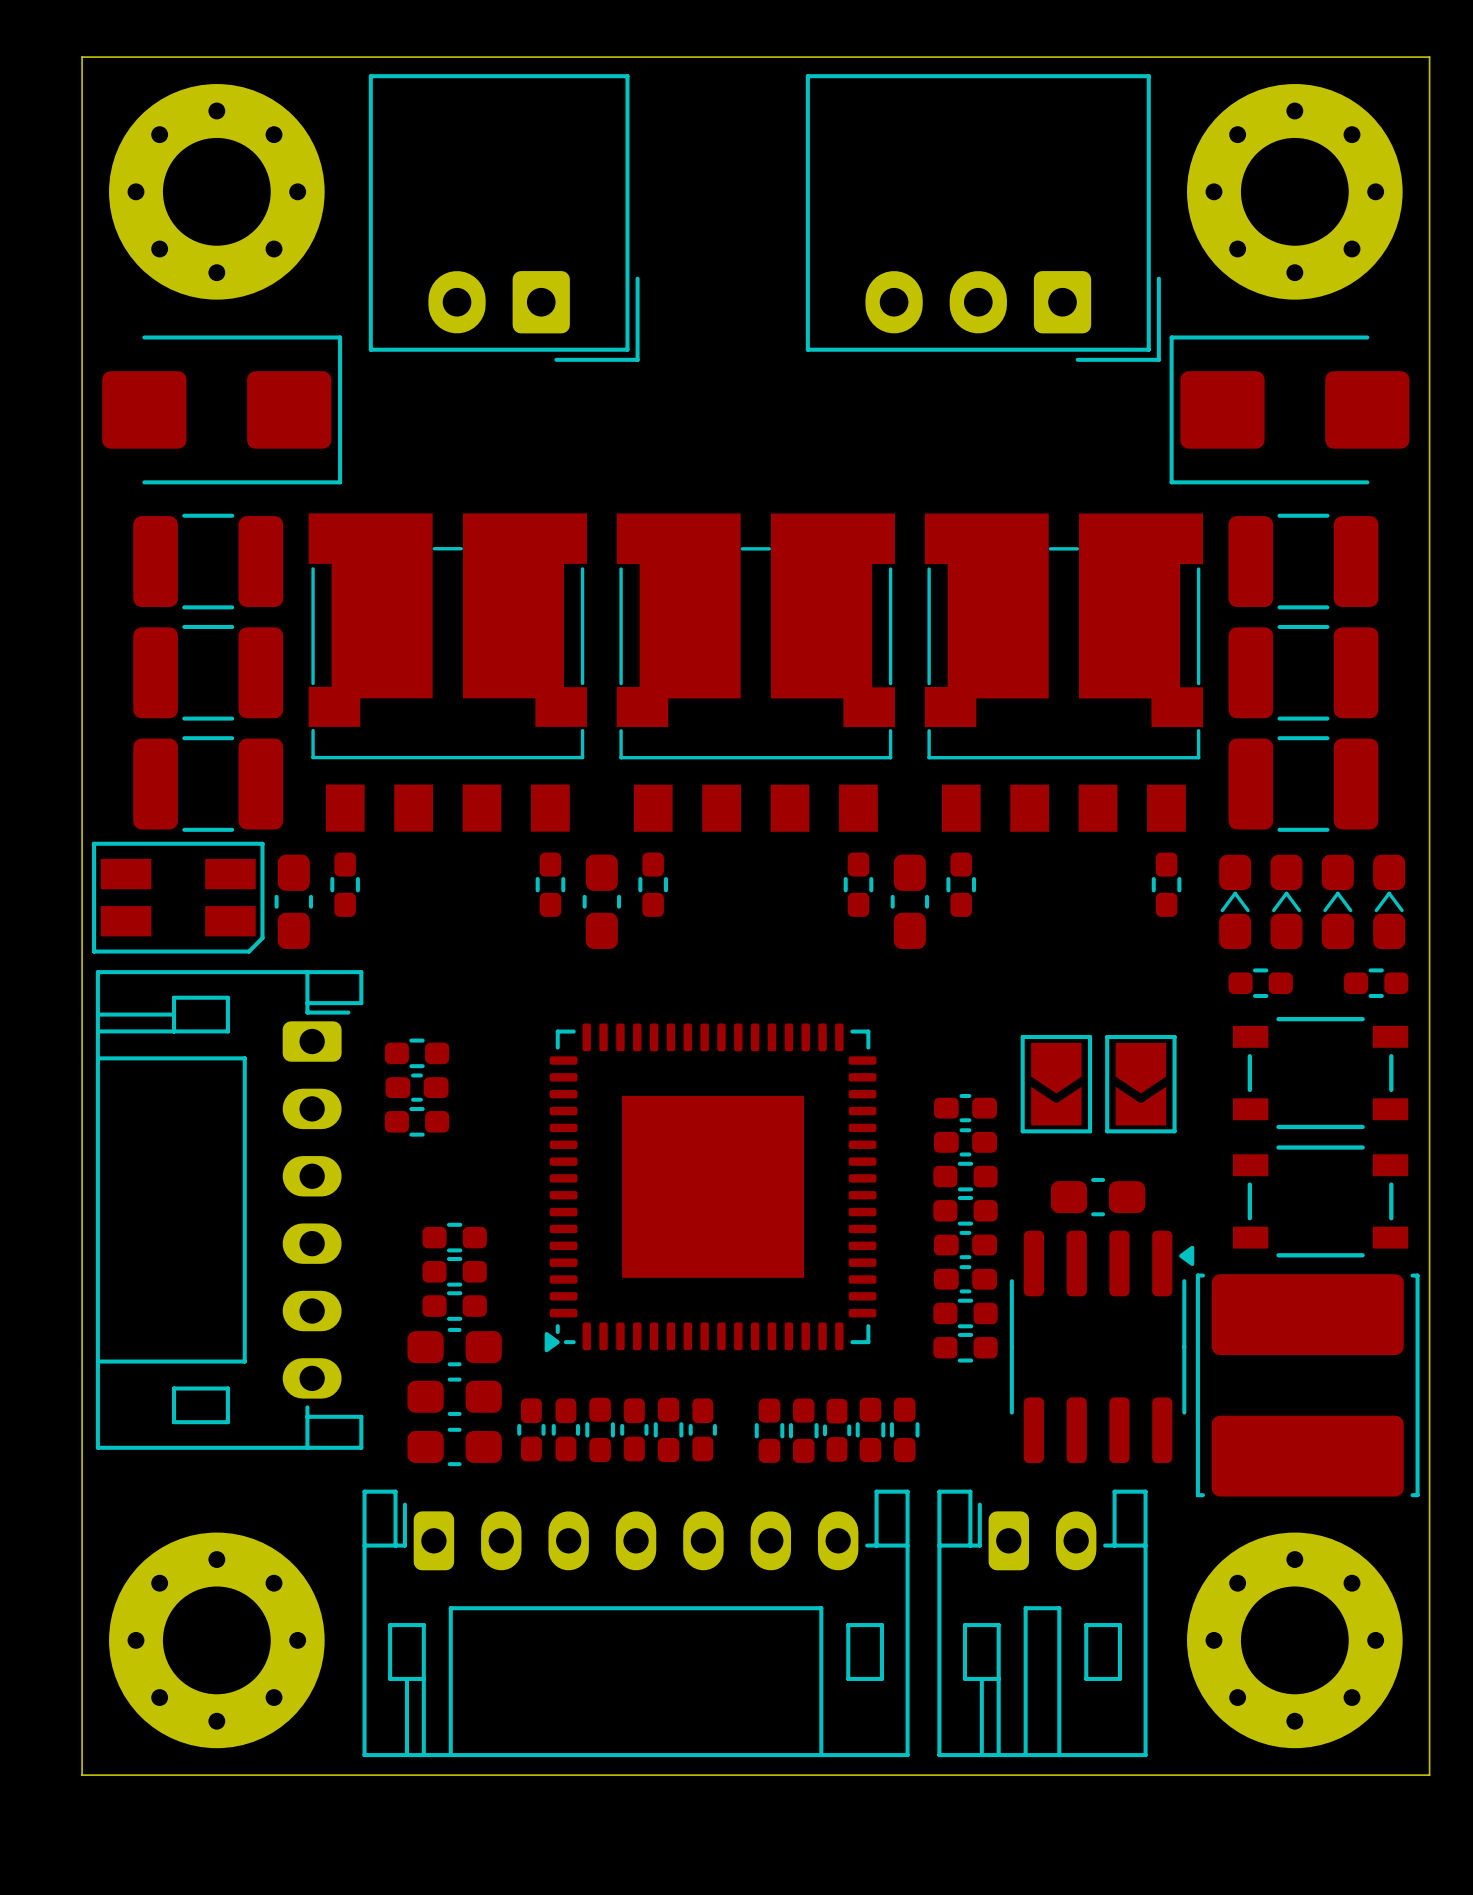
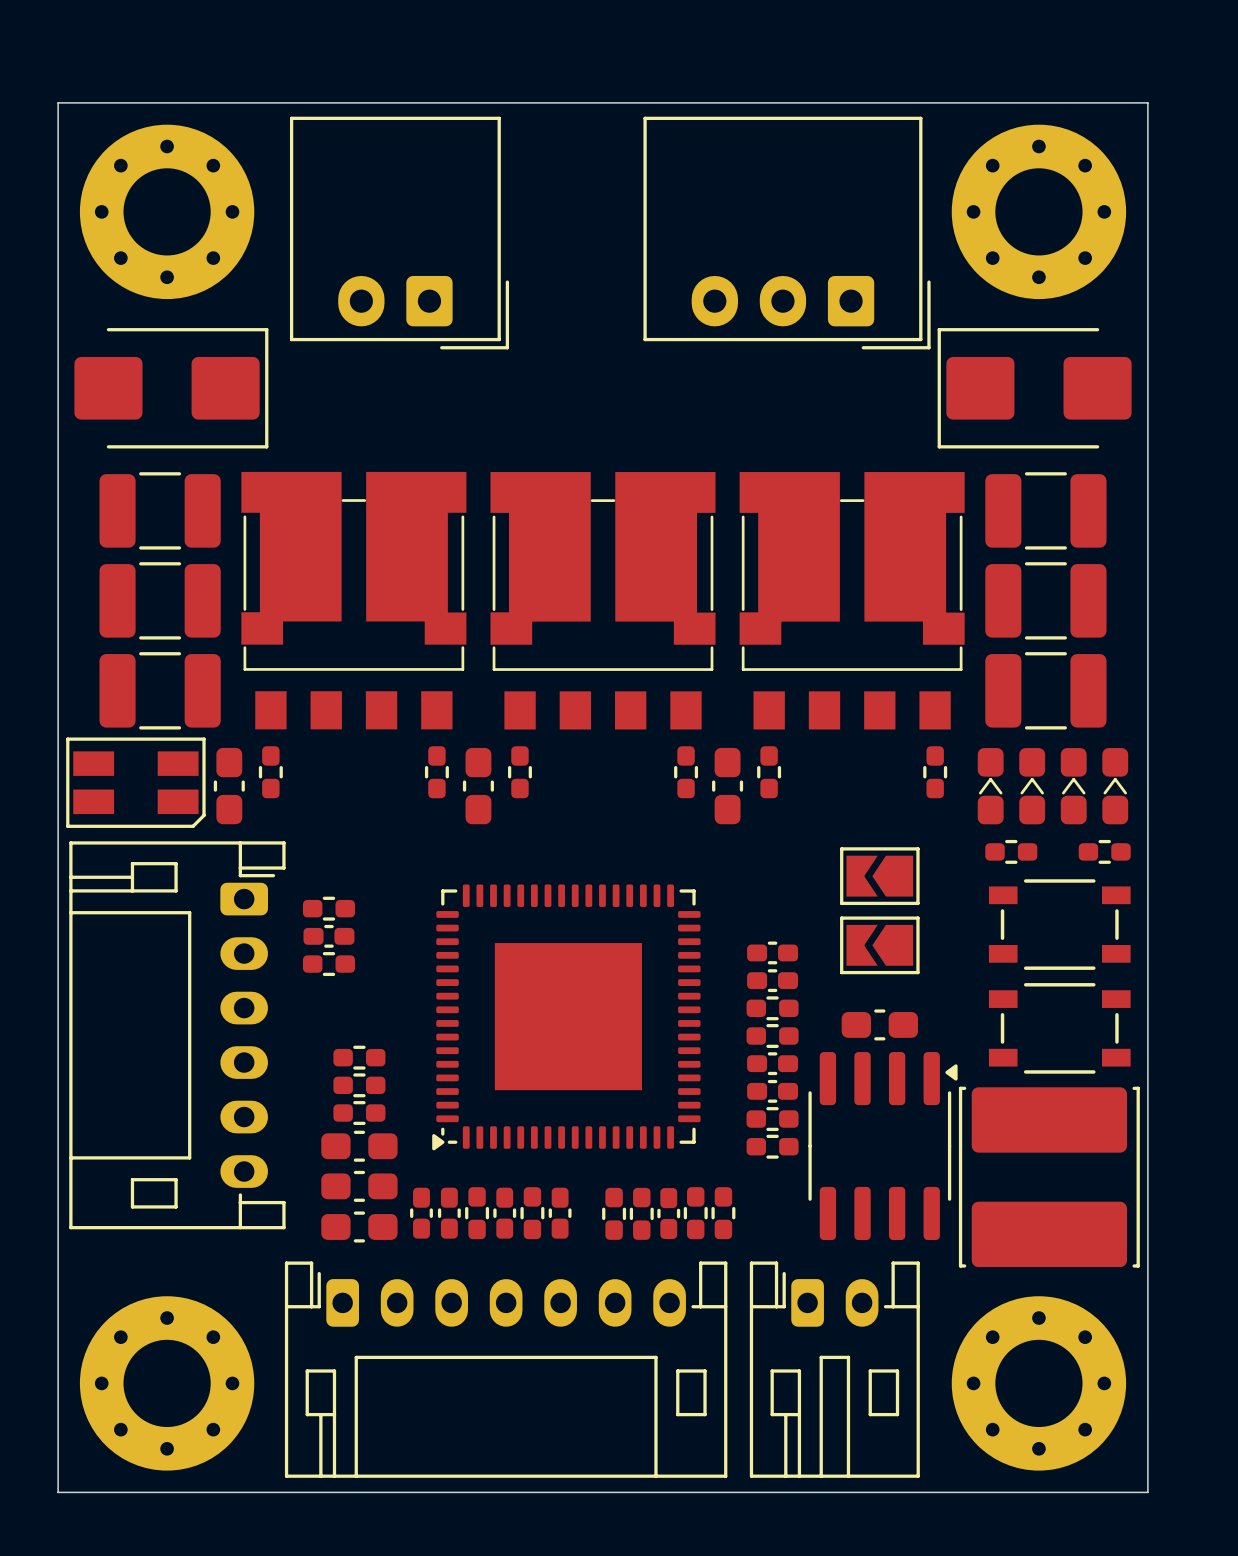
part: none -> (879, 876)
part: (1056, 1084) -> none
part: (1140, 1084) -> none
part: none -> (879, 945)

